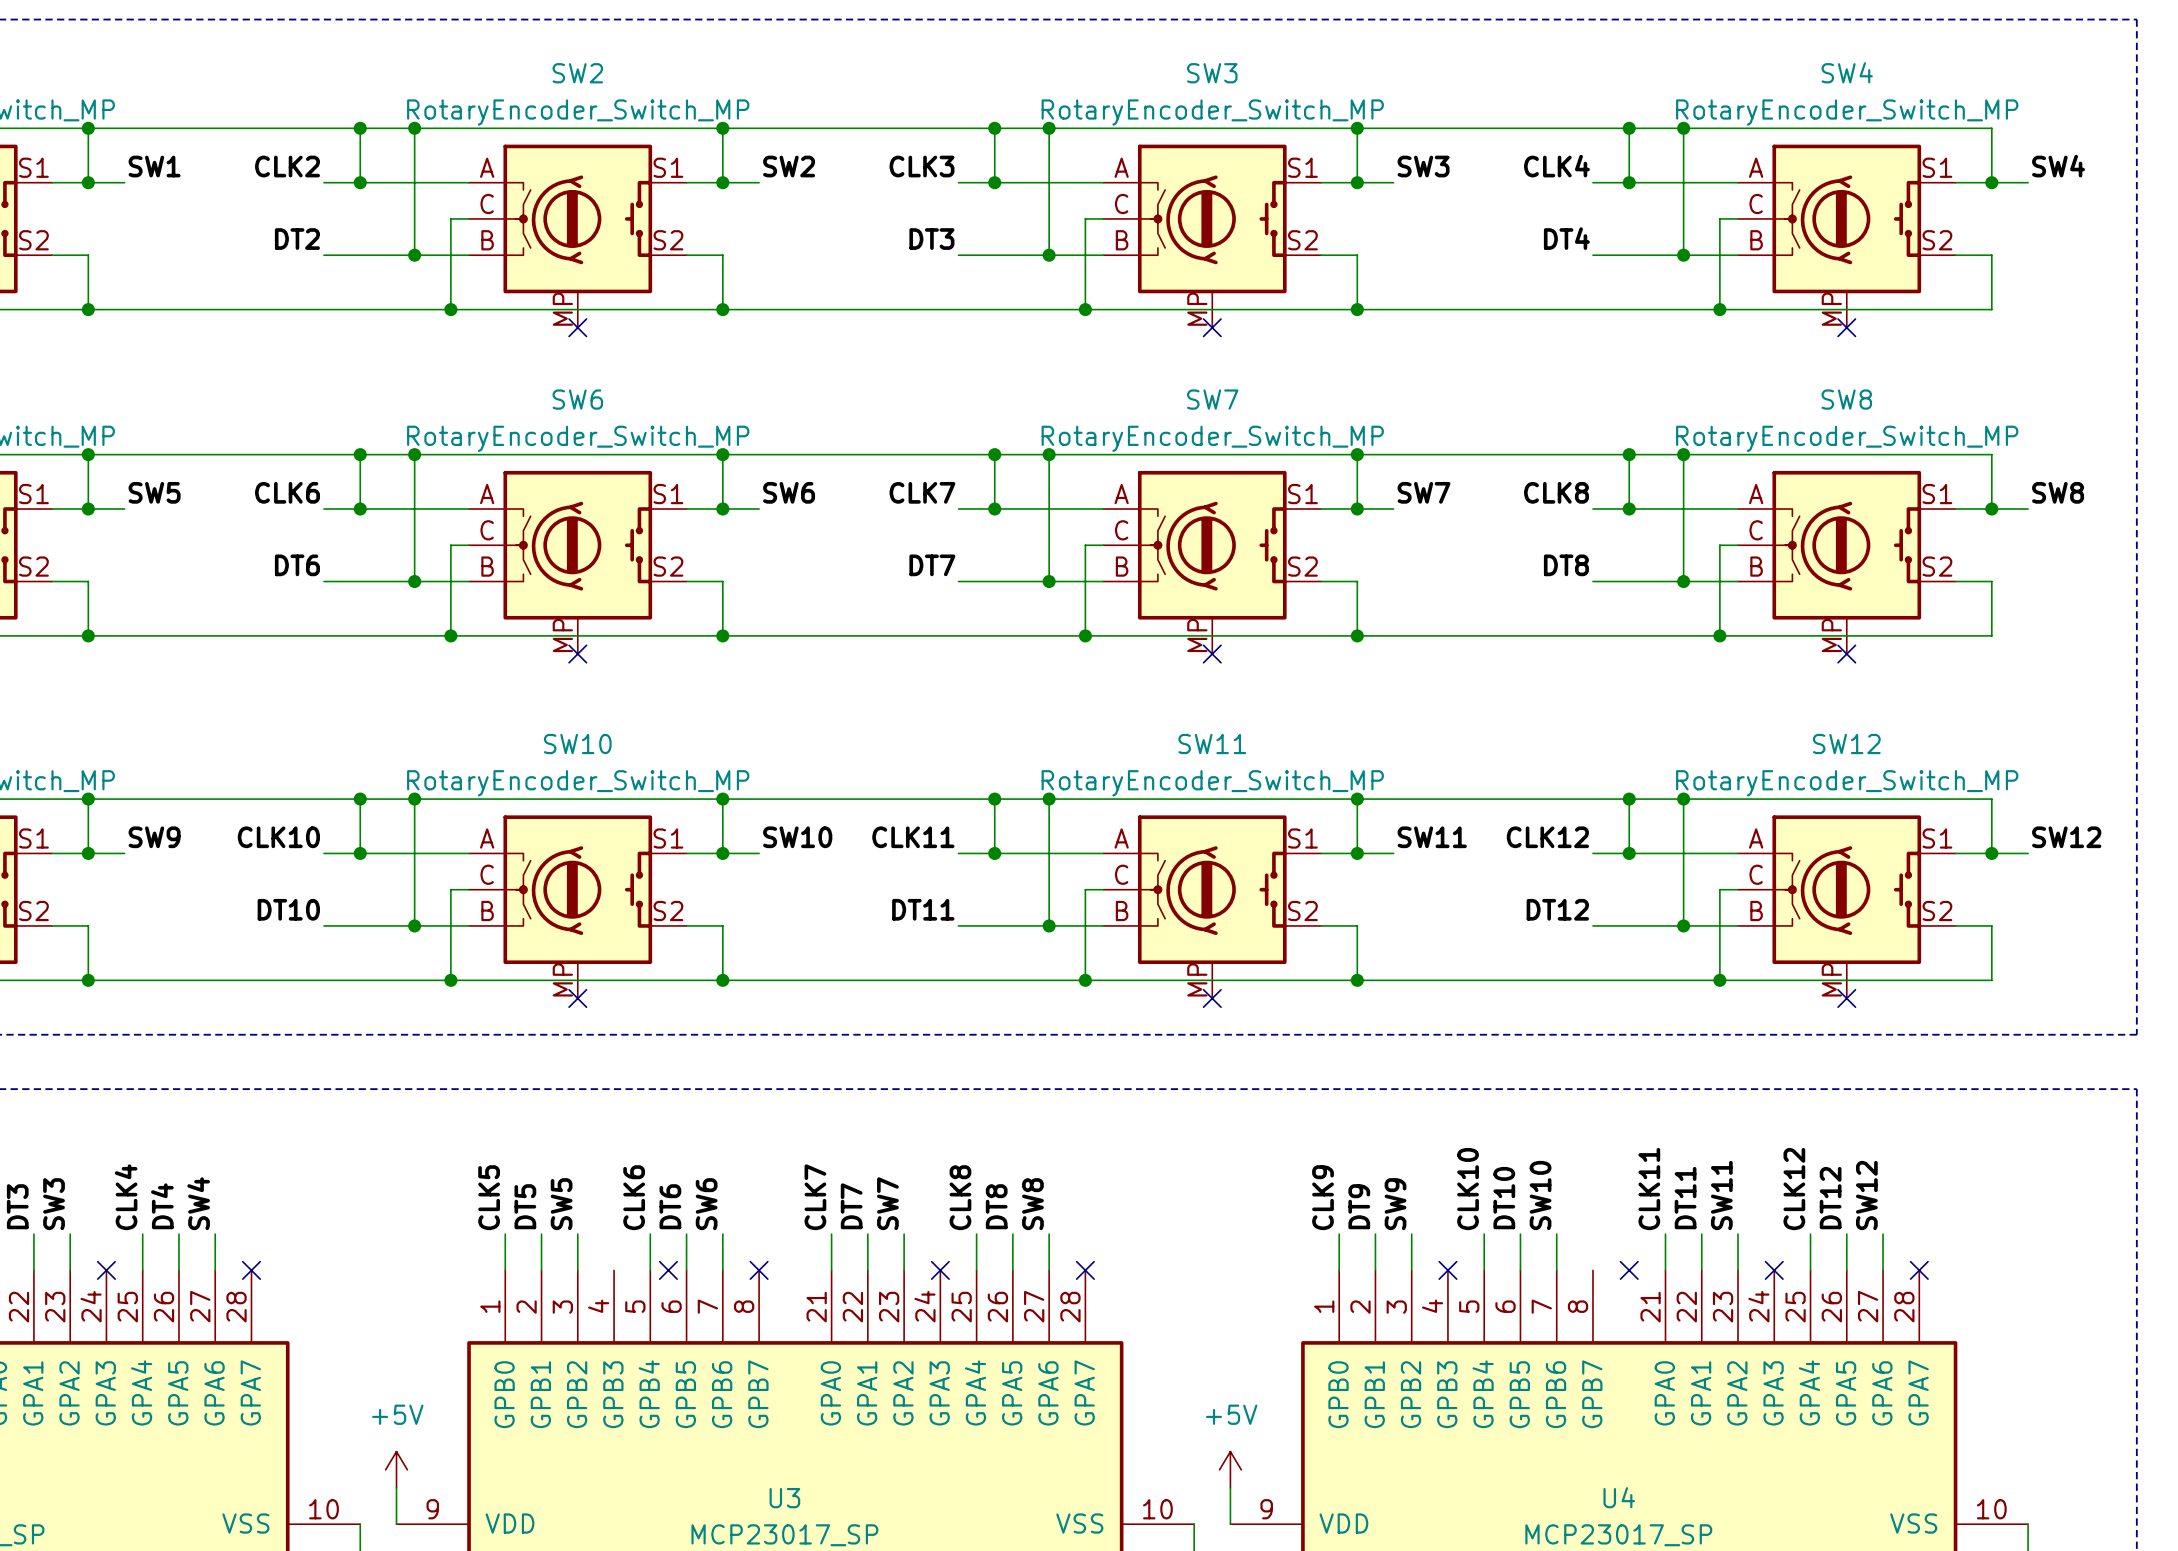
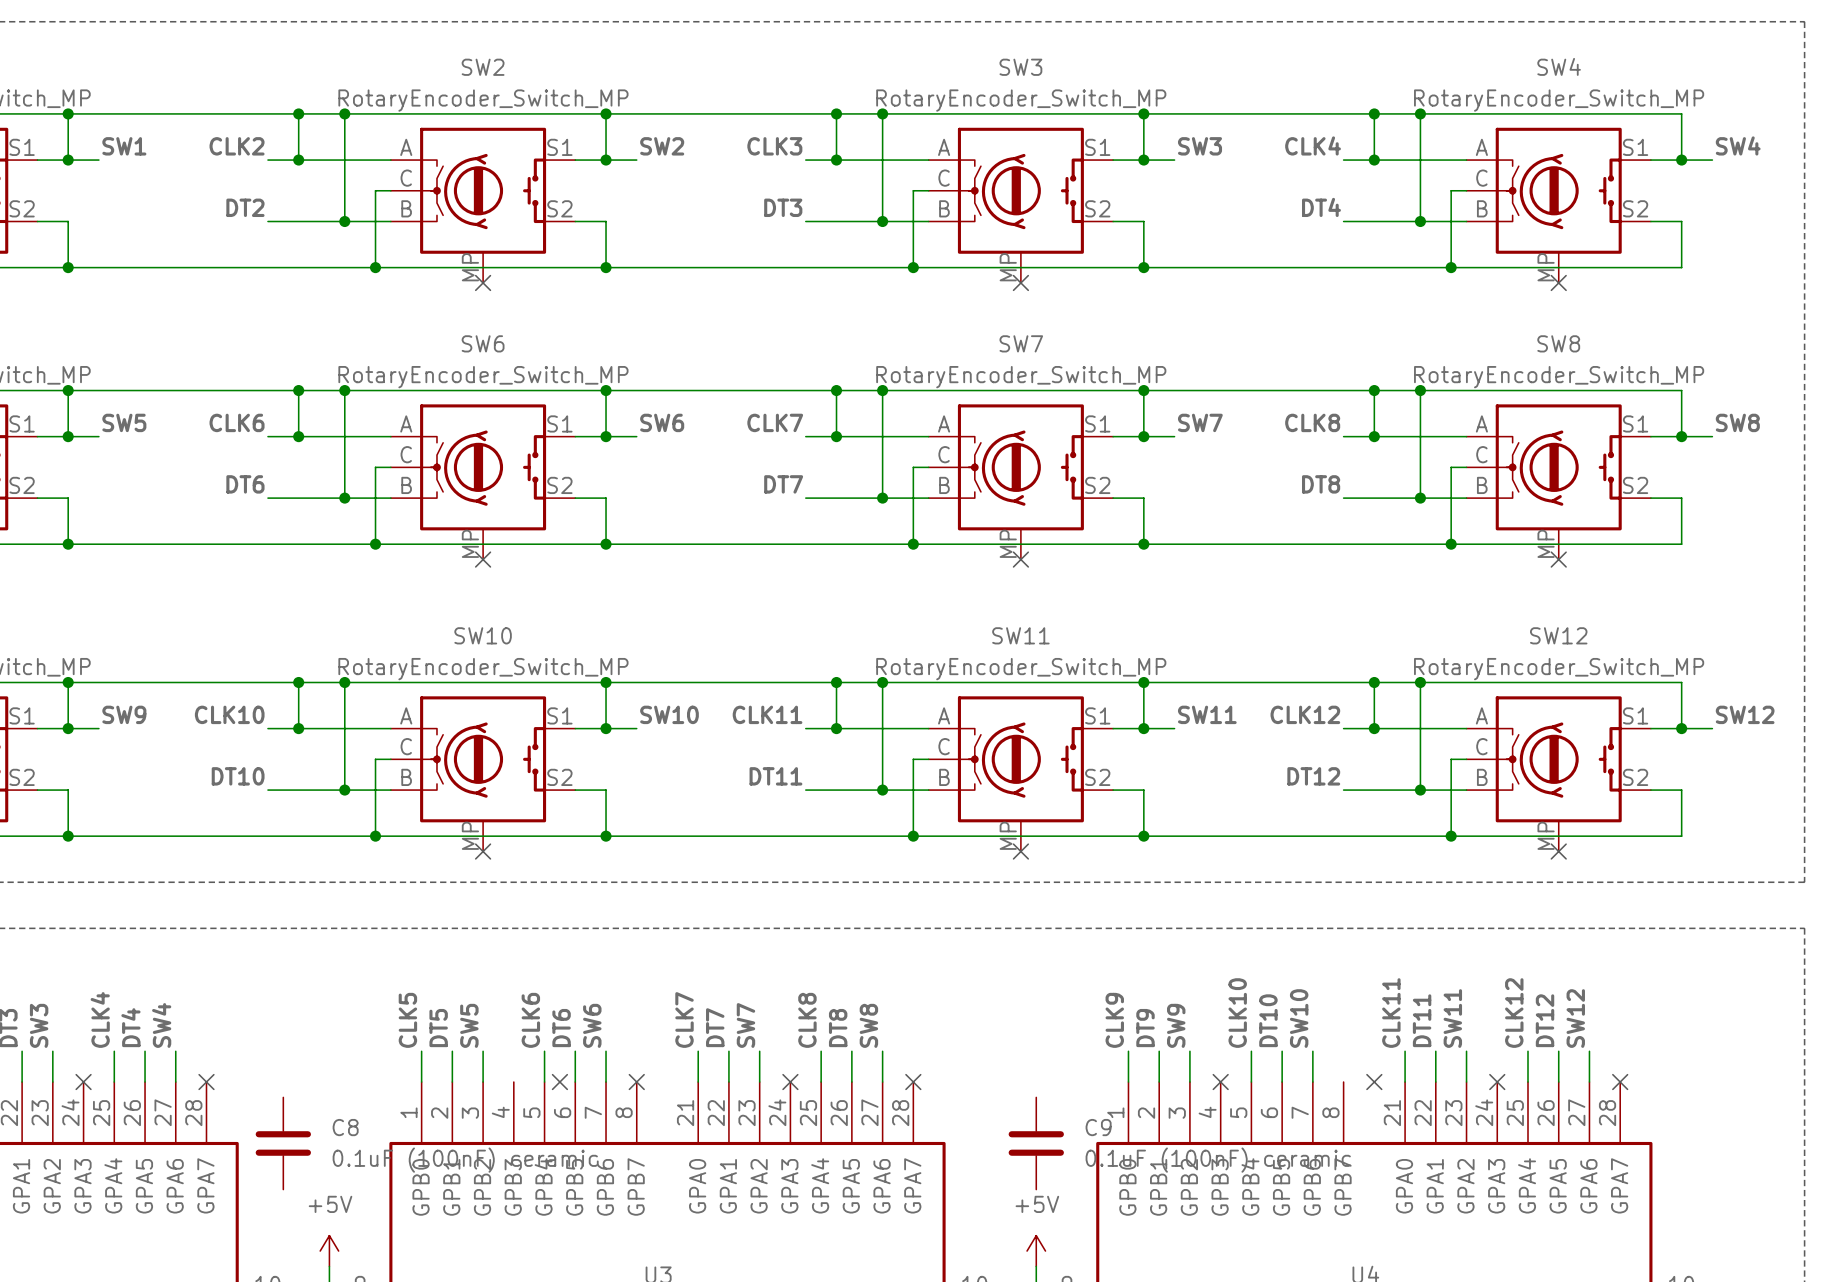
C8: none -> 0.1uF (100nF) ceramic (283, 1143)
C9: none -> 0.1uF (100nF) ceramic (1036, 1143)

